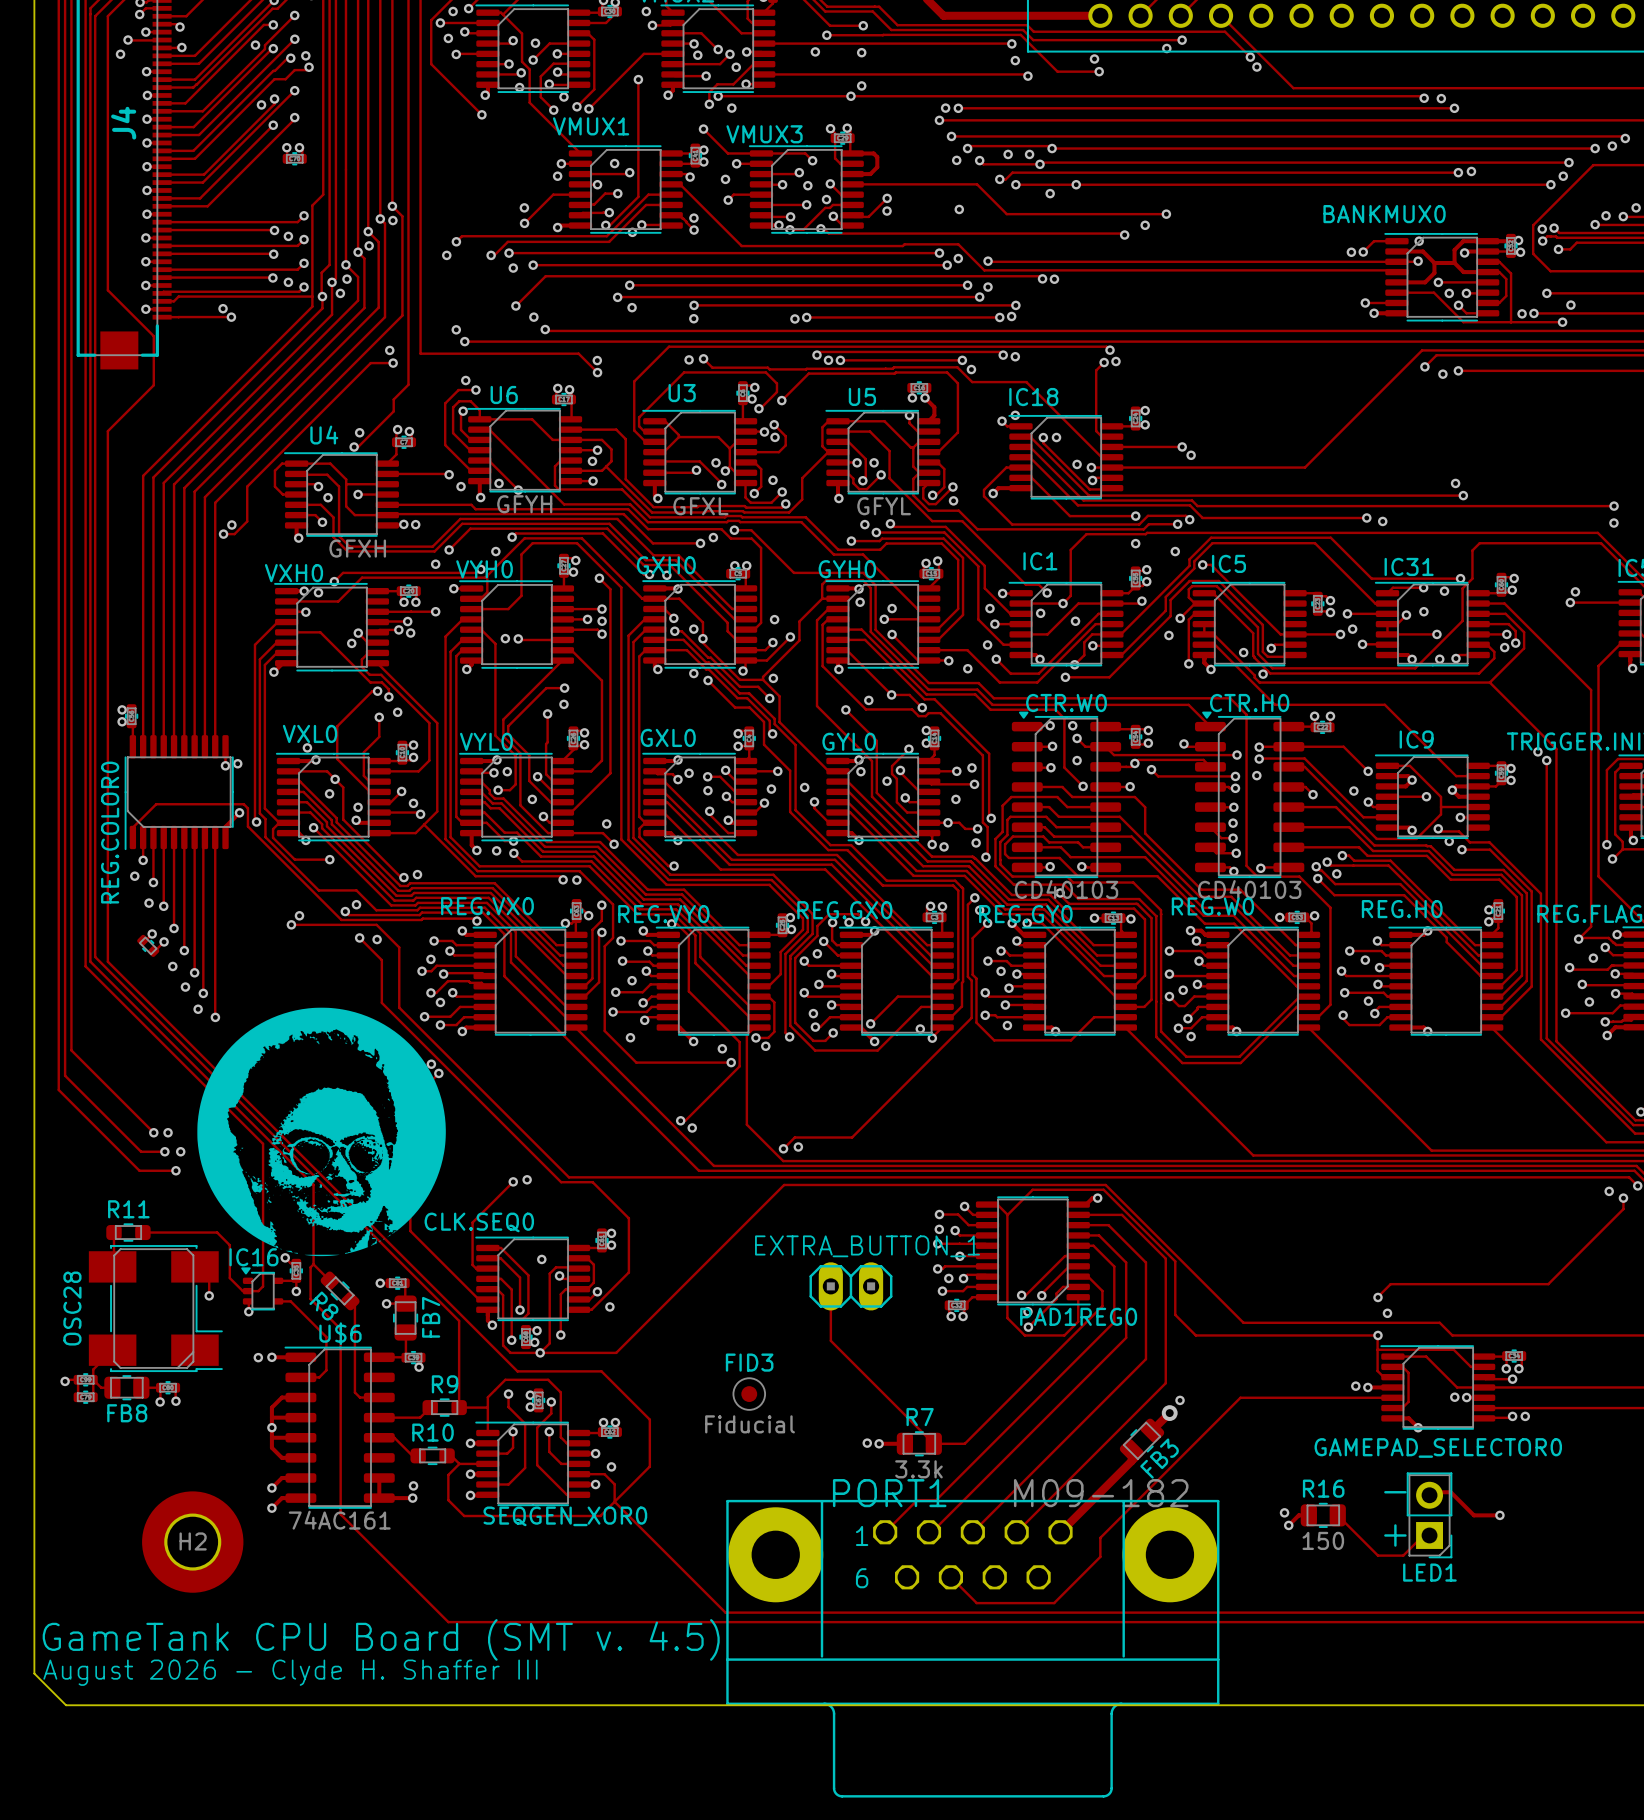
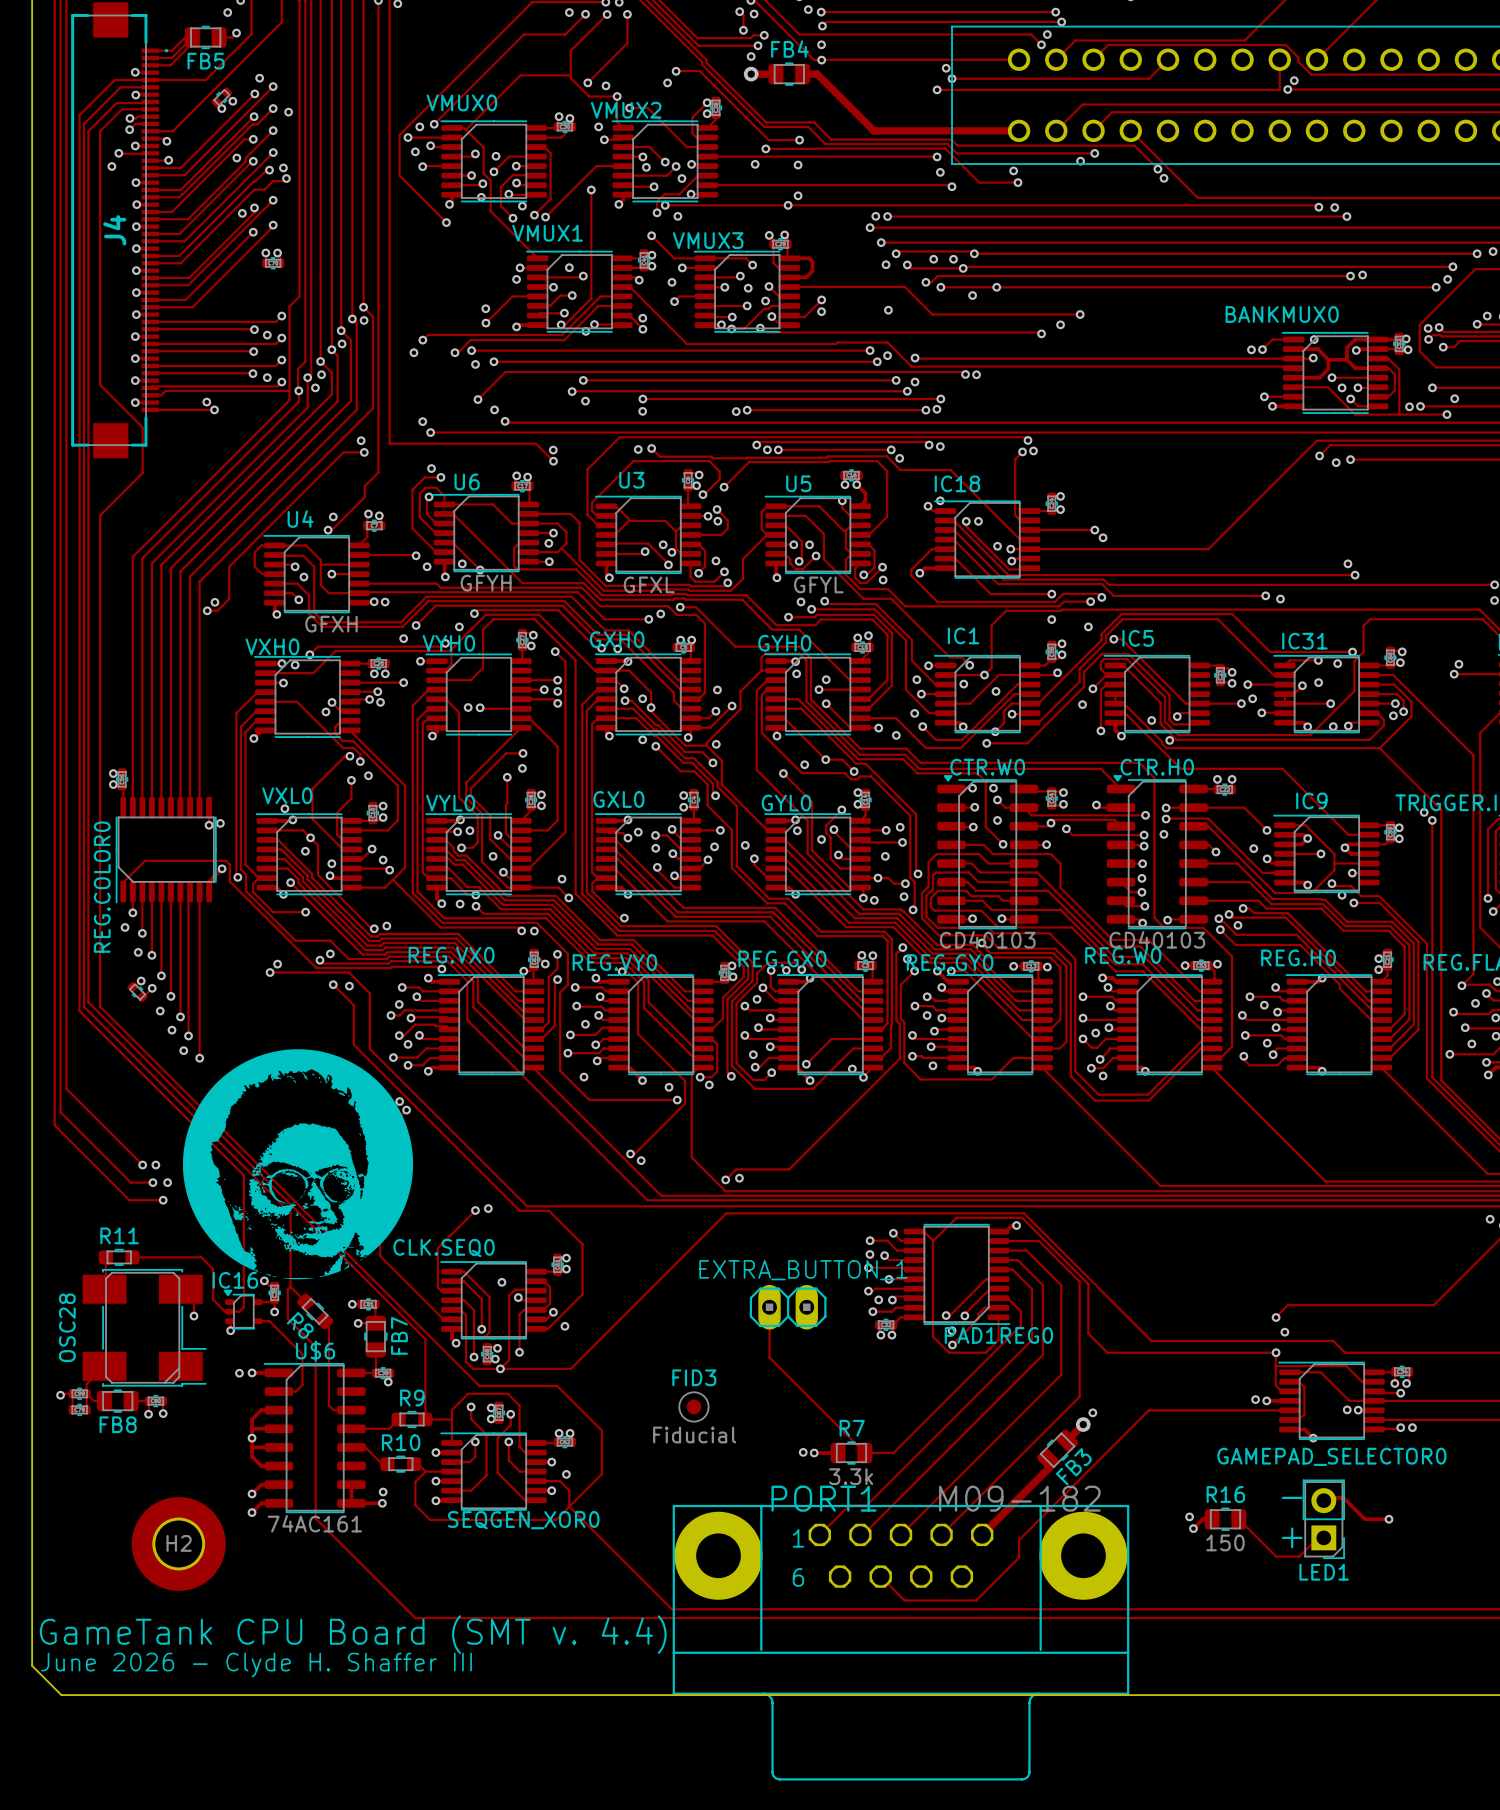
text: GameTank CPU Board (SMT v. 4.5) (381, 1639) -> GameTank CPU Board (SMT v. 4.4) (353, 1634)
text: August 2026 - Clyde H. Shaffer III (290, 1672) -> June 2026 - Clyde H. Shaffer III (256, 1664)

